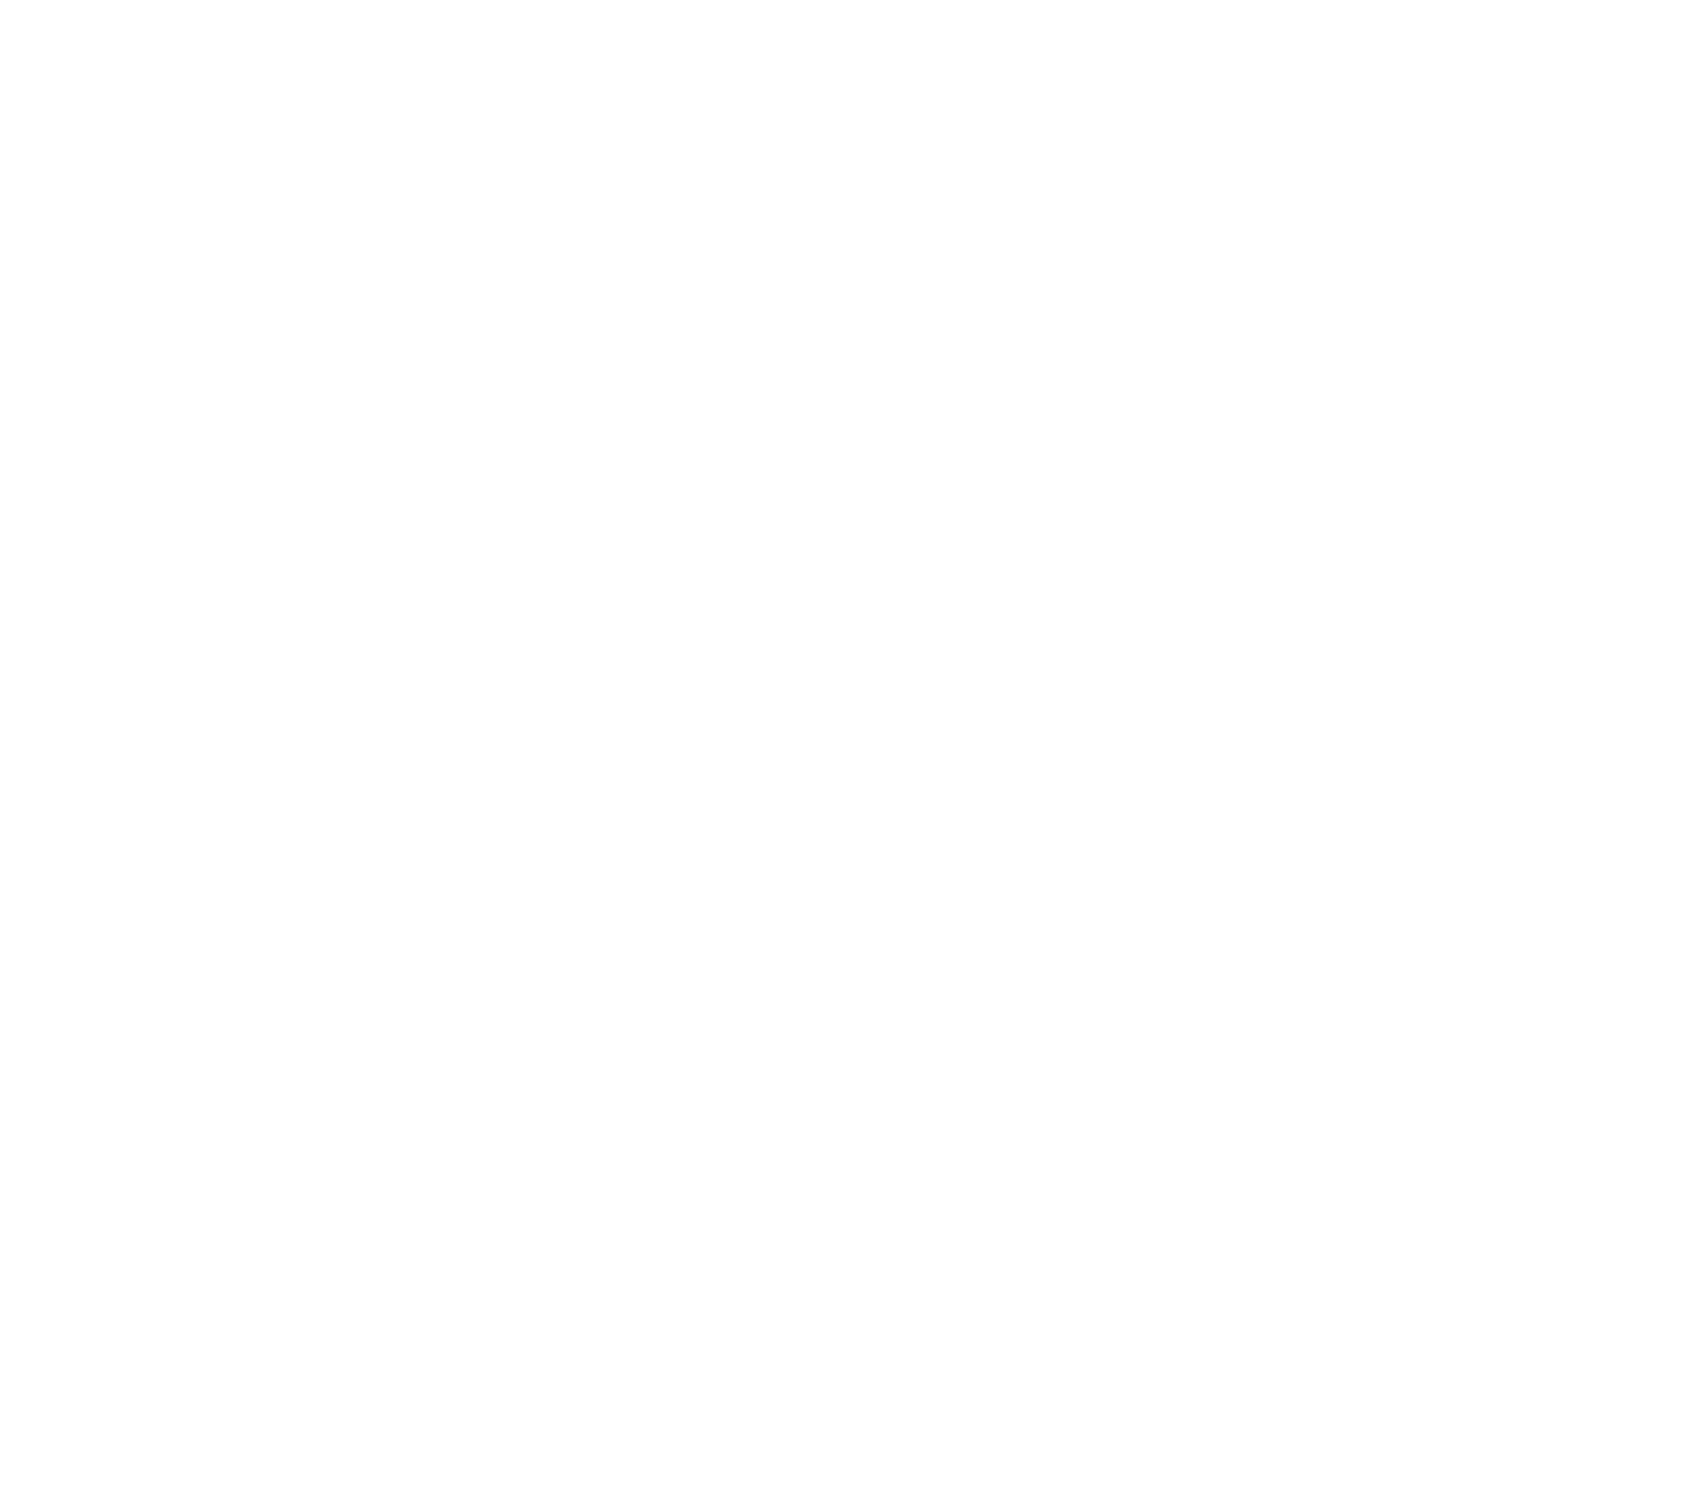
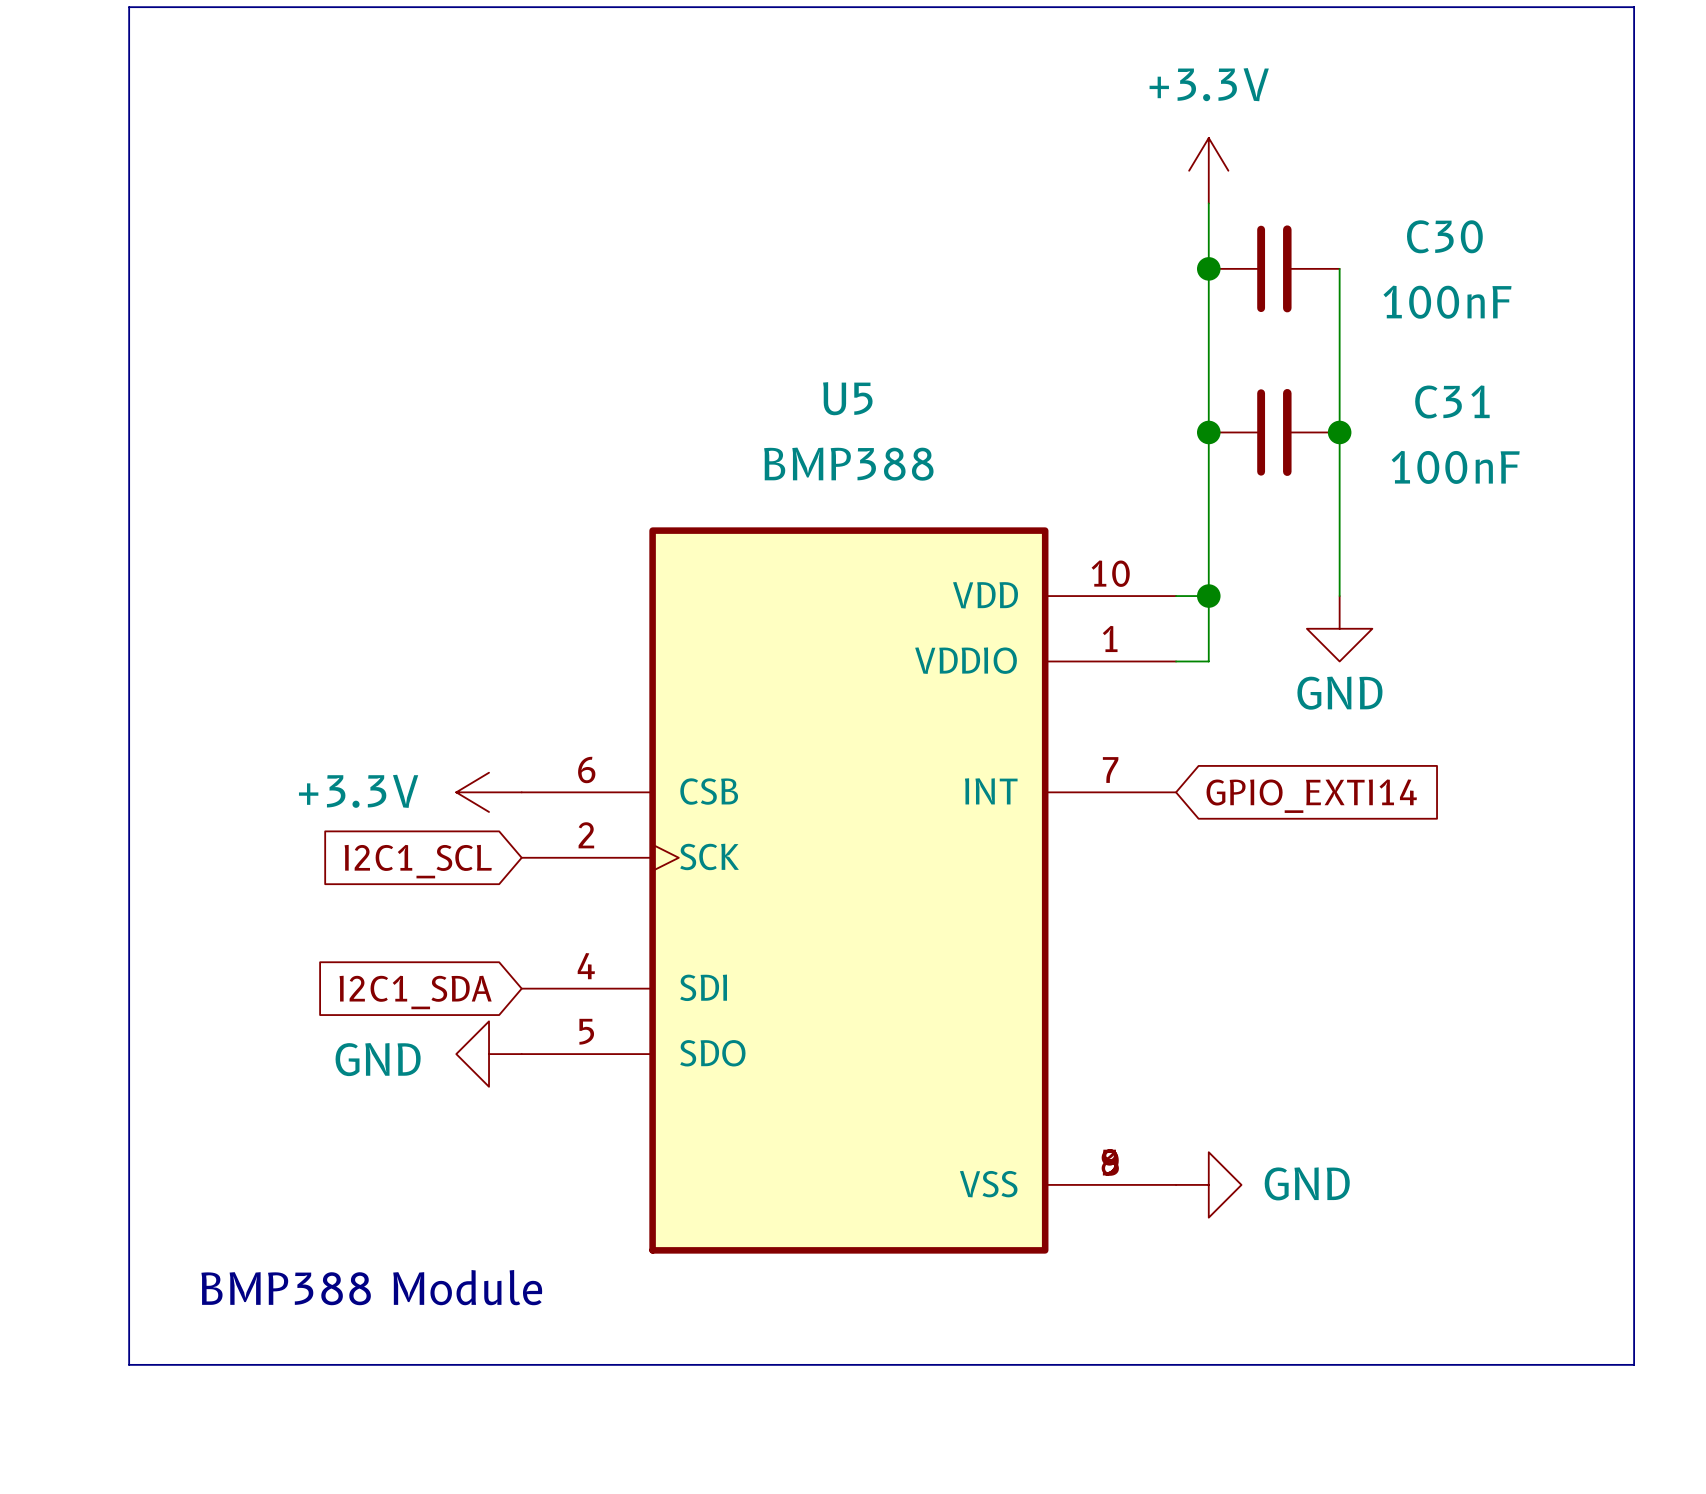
line: none -> (129, 7) (1634, 7) (1634, 1364) (129, 1364) (129, 7)
power symbol: none -> +3.3V (1208, 170)
wire: none -> (1208, 203) (1208, 661) (1176, 661)
junction: none -> (1208, 268)
C30: none -> 100nF (1274, 268)
wire: none -> (1339, 268) (1339, 596)
junction: none -> (1208, 432)
C31: none -> 100nF (1274, 432)
junction: none -> (1339, 432)
wire: none -> (1176, 596) (1208, 596)
junction: none -> (1208, 596)
power symbol: none -> GND (1339, 628)
power symbol: none -> +3.3V (489, 792)
global label: none -> GPIO_EXTI14 (1311, 796)
global label: none -> I2C1_SCL (418, 861)
U5: none -> BMP388 (848, 890)
global label: none -> I2C1_SDA (415, 992)
power symbol: none -> GND (489, 1054)
power symbol: none -> GND (1208, 1184)
text: none -> BMP388 Module (371, 1287)

